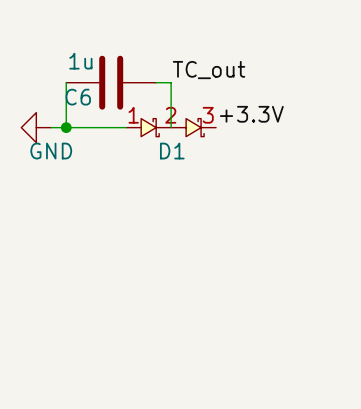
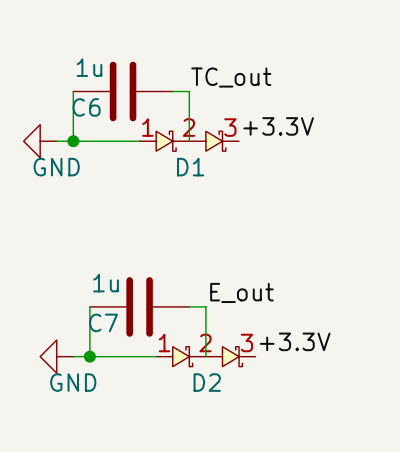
label: none -> E_out (241, 292)
wire: none -> (89, 306) (89, 356)
C7: none -> 1u (139, 306)
wire: none -> (189, 306) (205, 306) (205, 356)
label: none -> +3.3V (295, 341)
power symbol: none -> GND (56, 356)
wire: none -> (73, 356) (156, 356)
junction: none -> (89, 356)
D2: none -> (205, 356)

